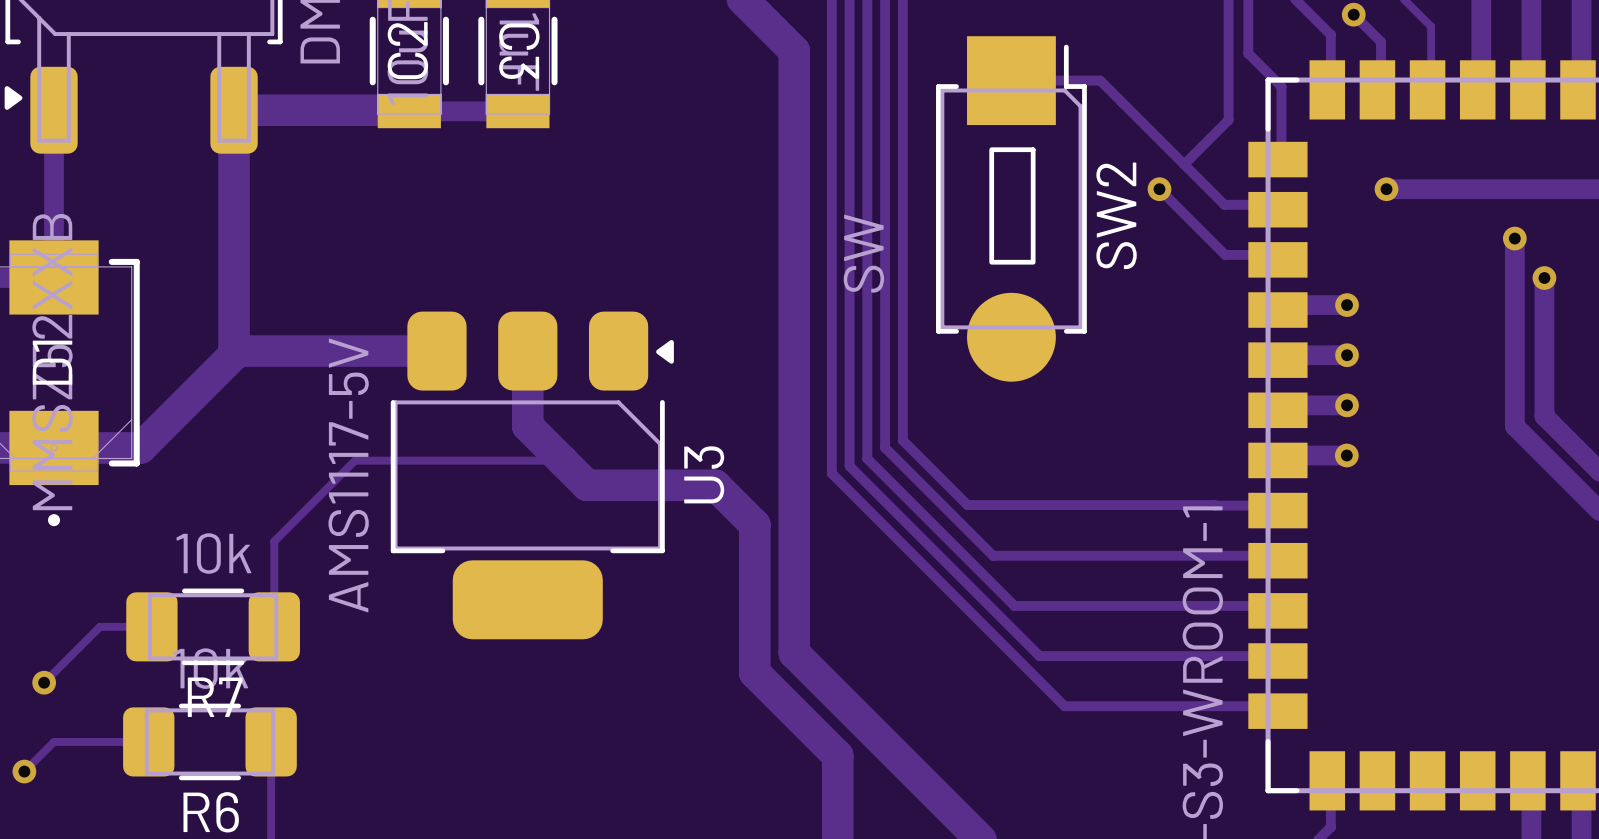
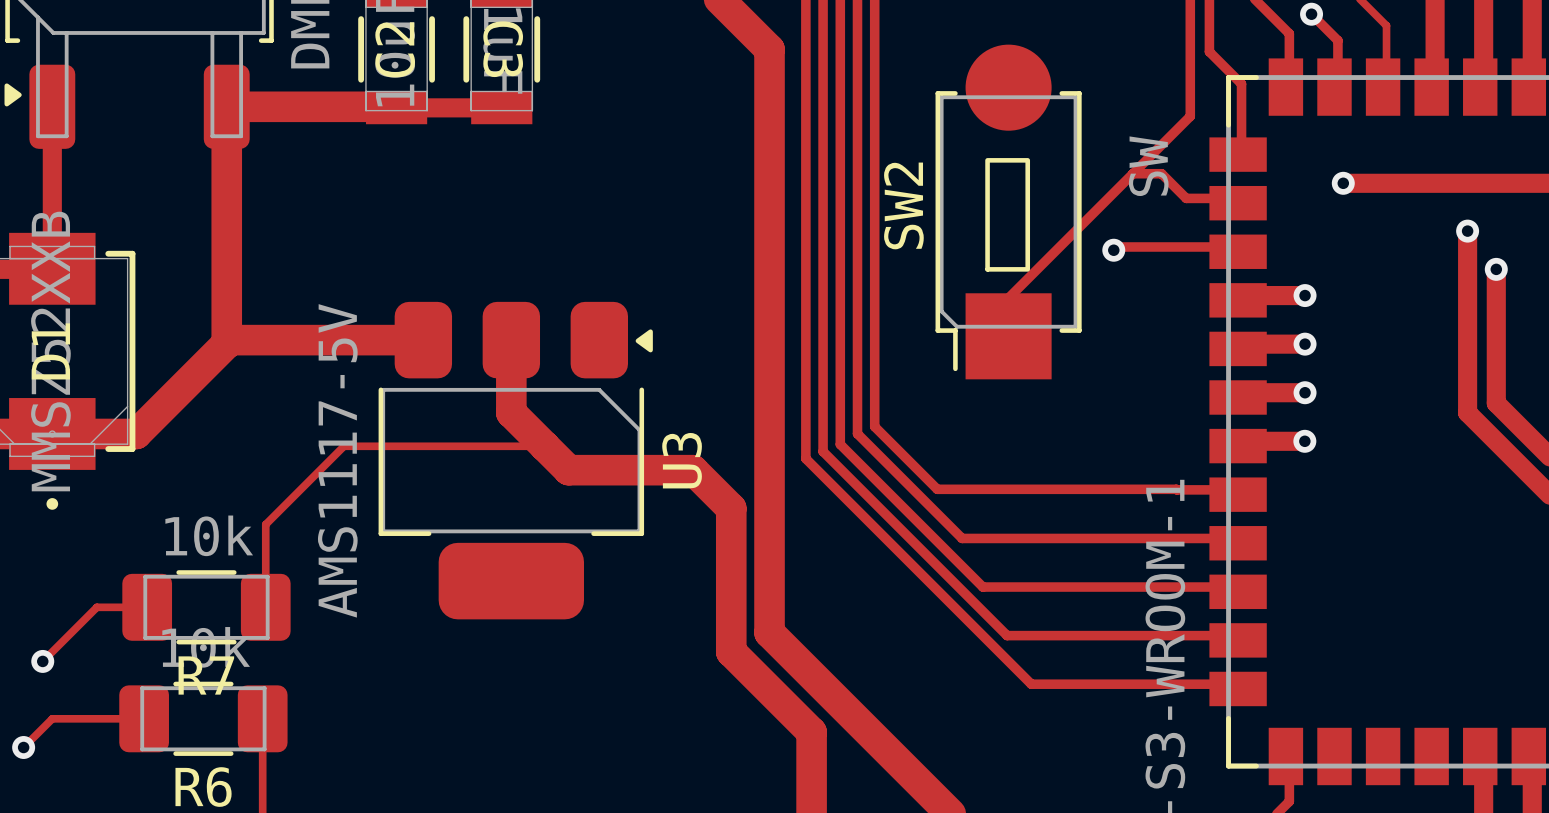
track: (1011, 80) (1100, 80) (1198, 179) -> (1132, 173) (1161, 173)
track: none -> (1147, 159) (1008, 298) (1008, 336)
track: (1159, 189) (1225, 254) -> (1113, 250) (1117, 246) (1187, 246)
via position: (1159, 189) -> (1113, 250)
SW2 rotation: 0° (1011, 208) -> 180° (1008, 211)

